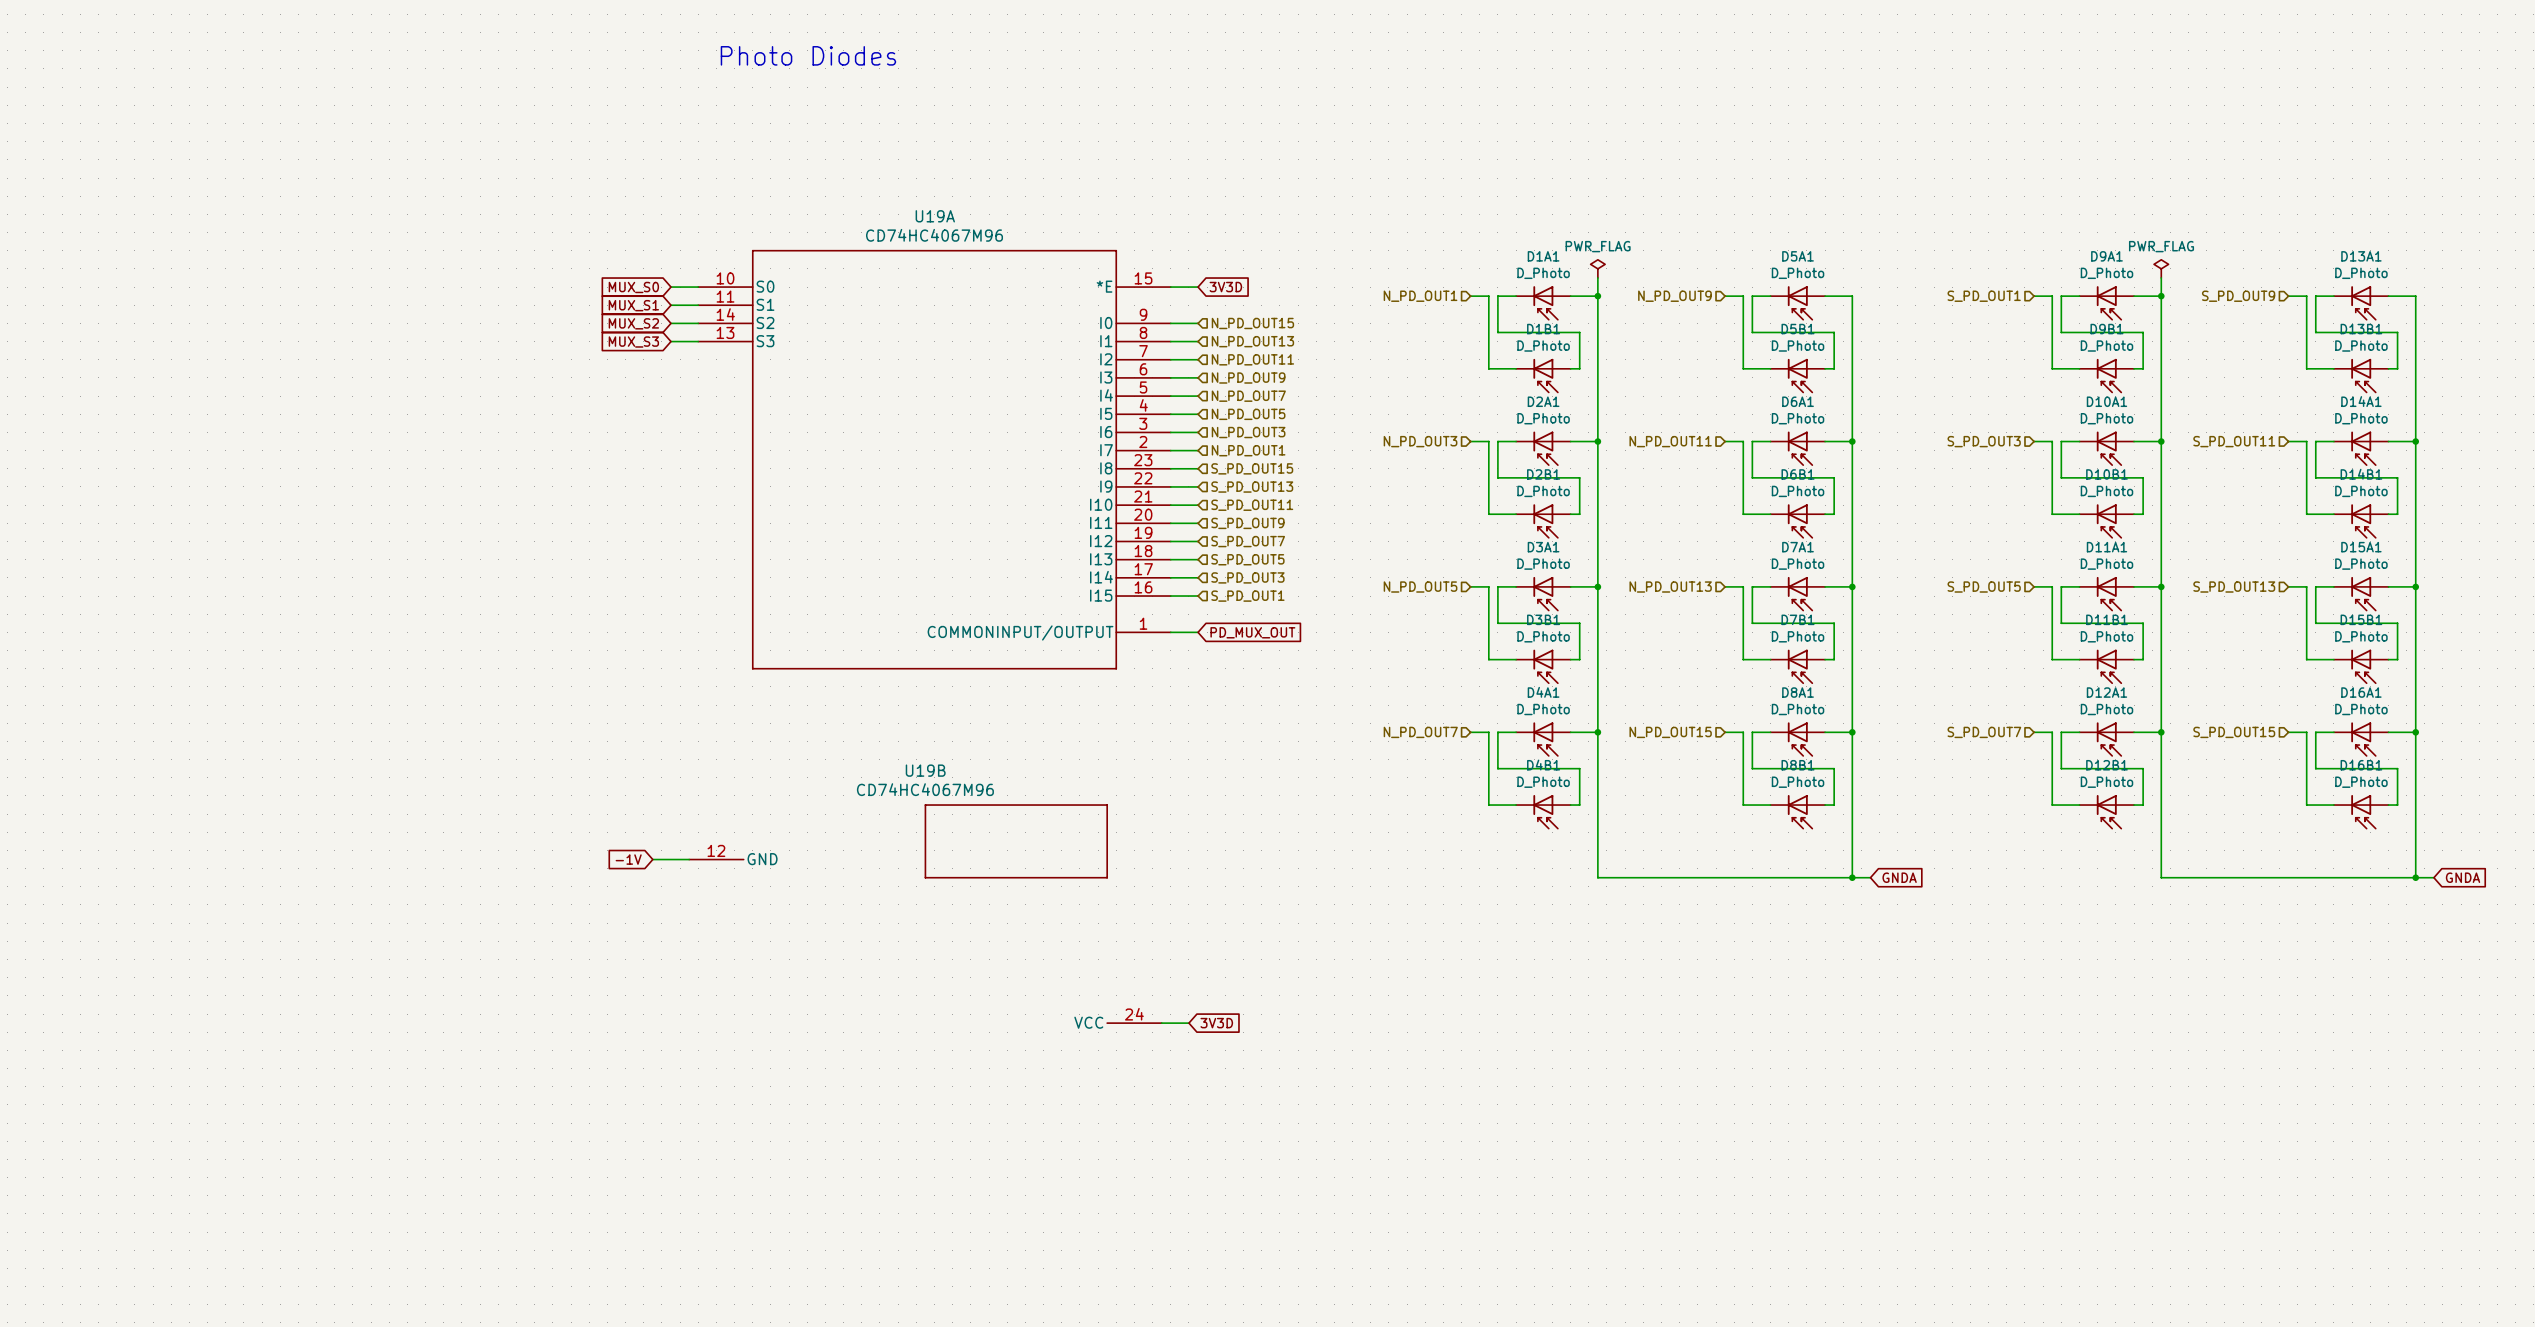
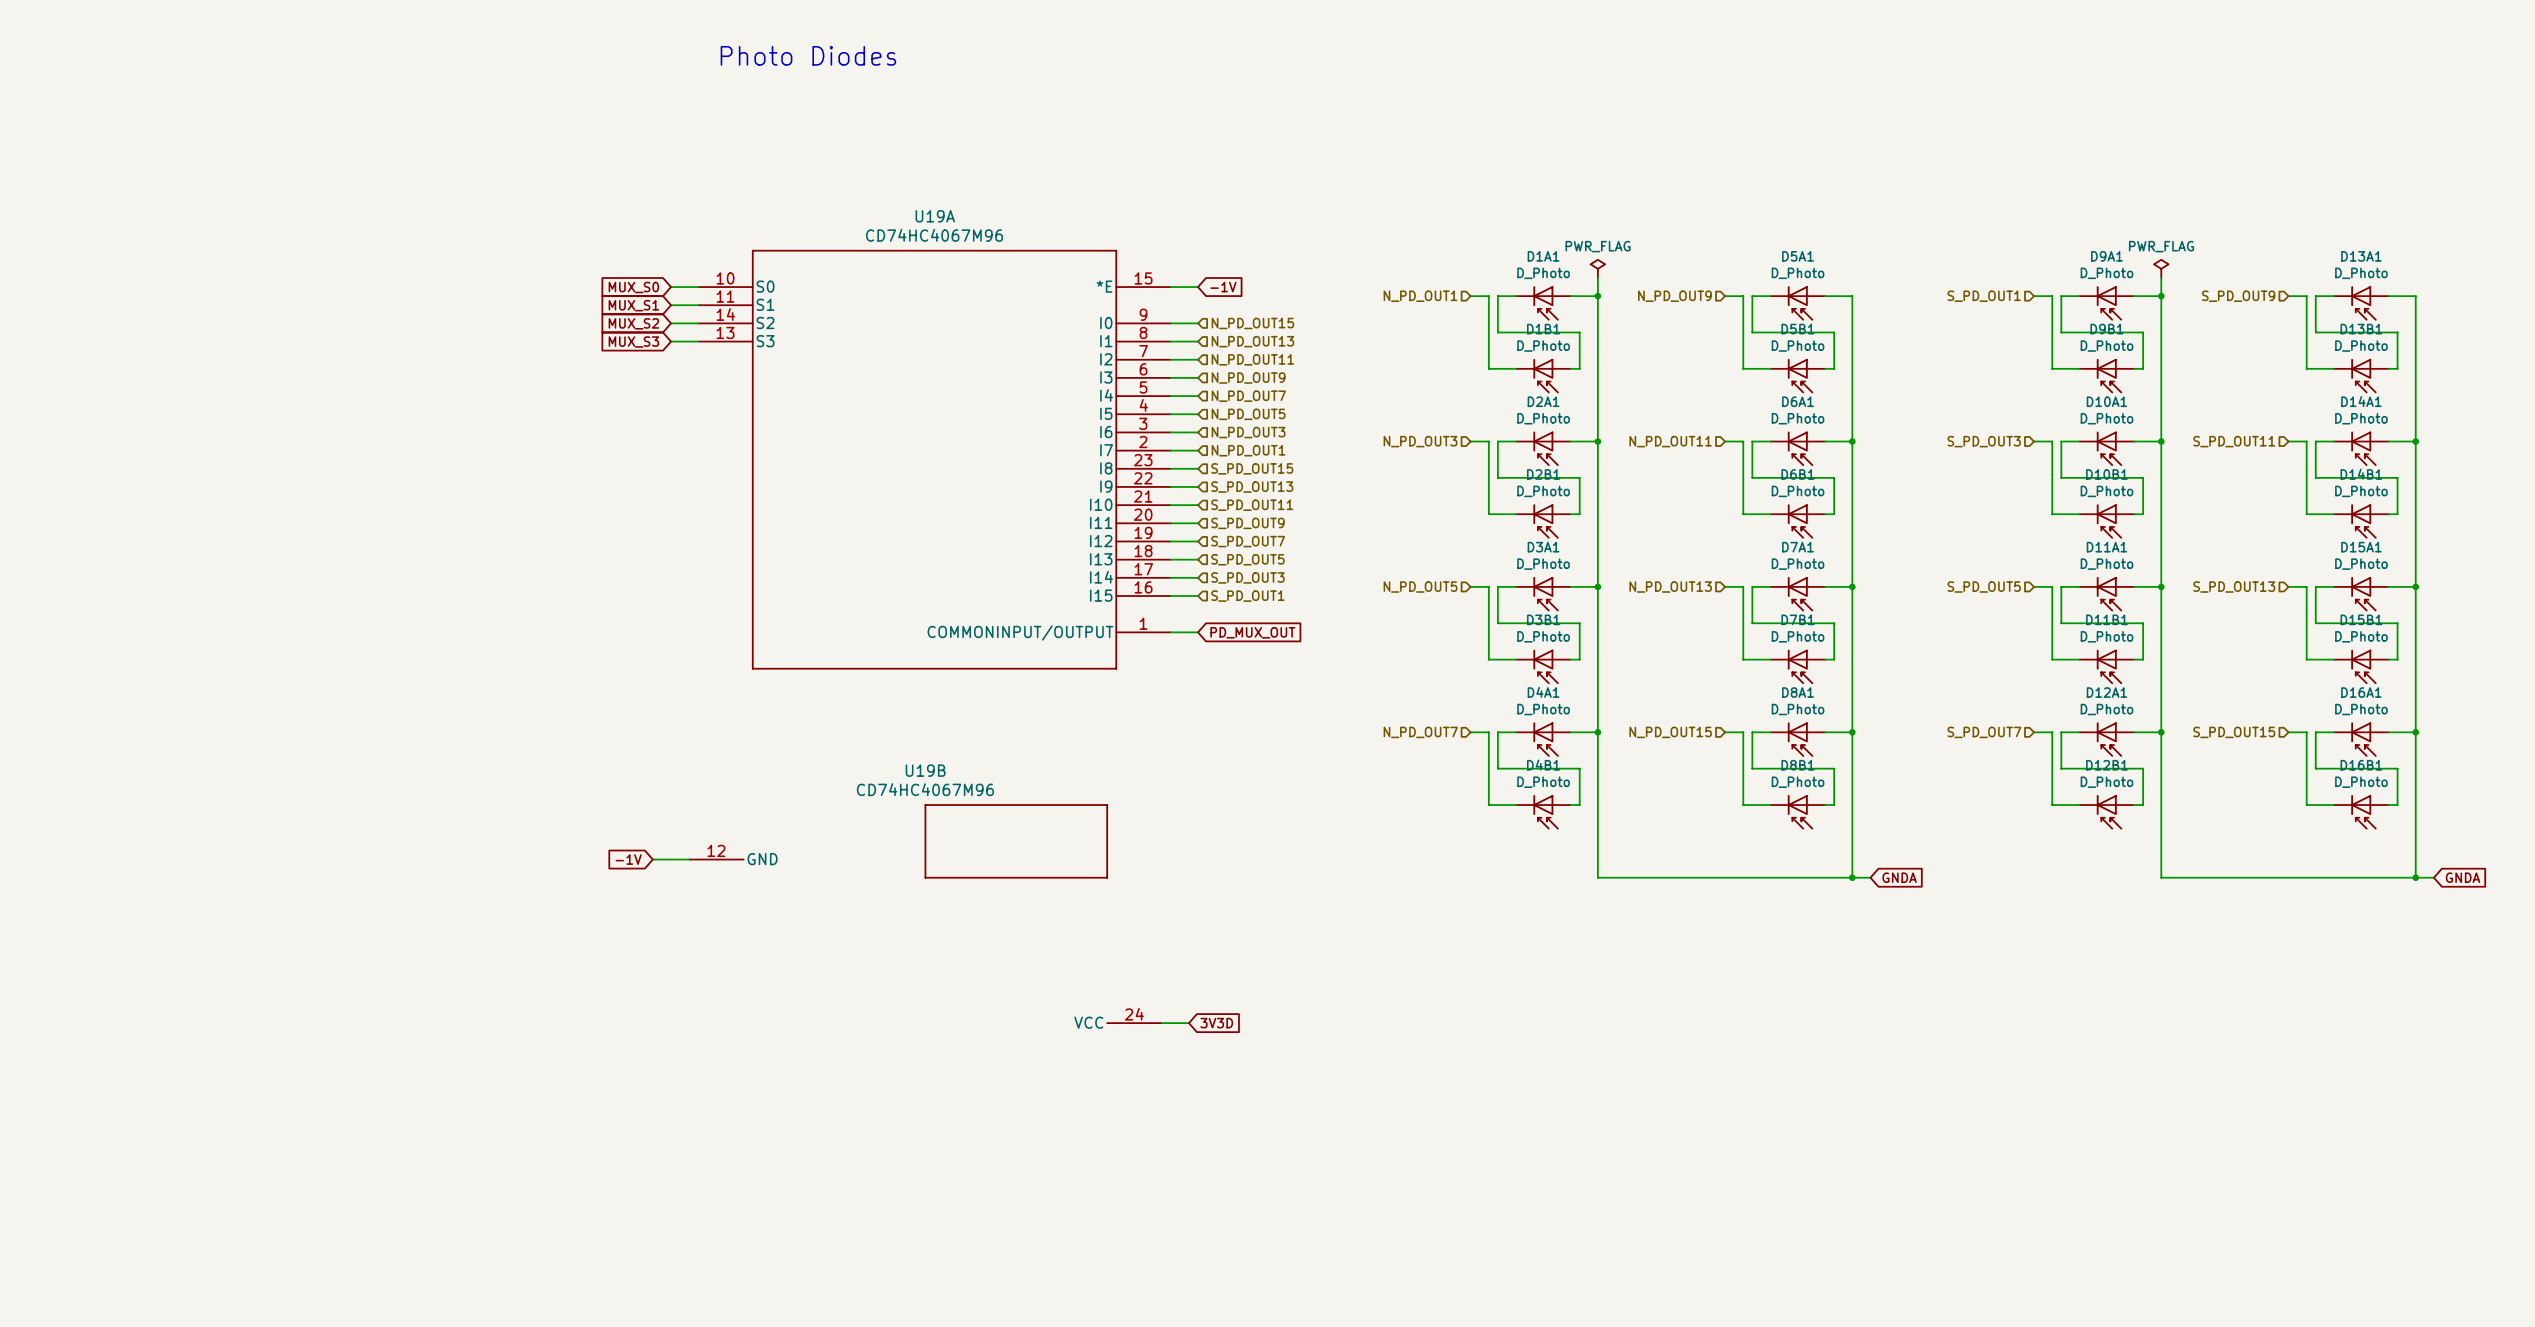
global label: 3V3D (1225, 287) -> -1V (1223, 287)

